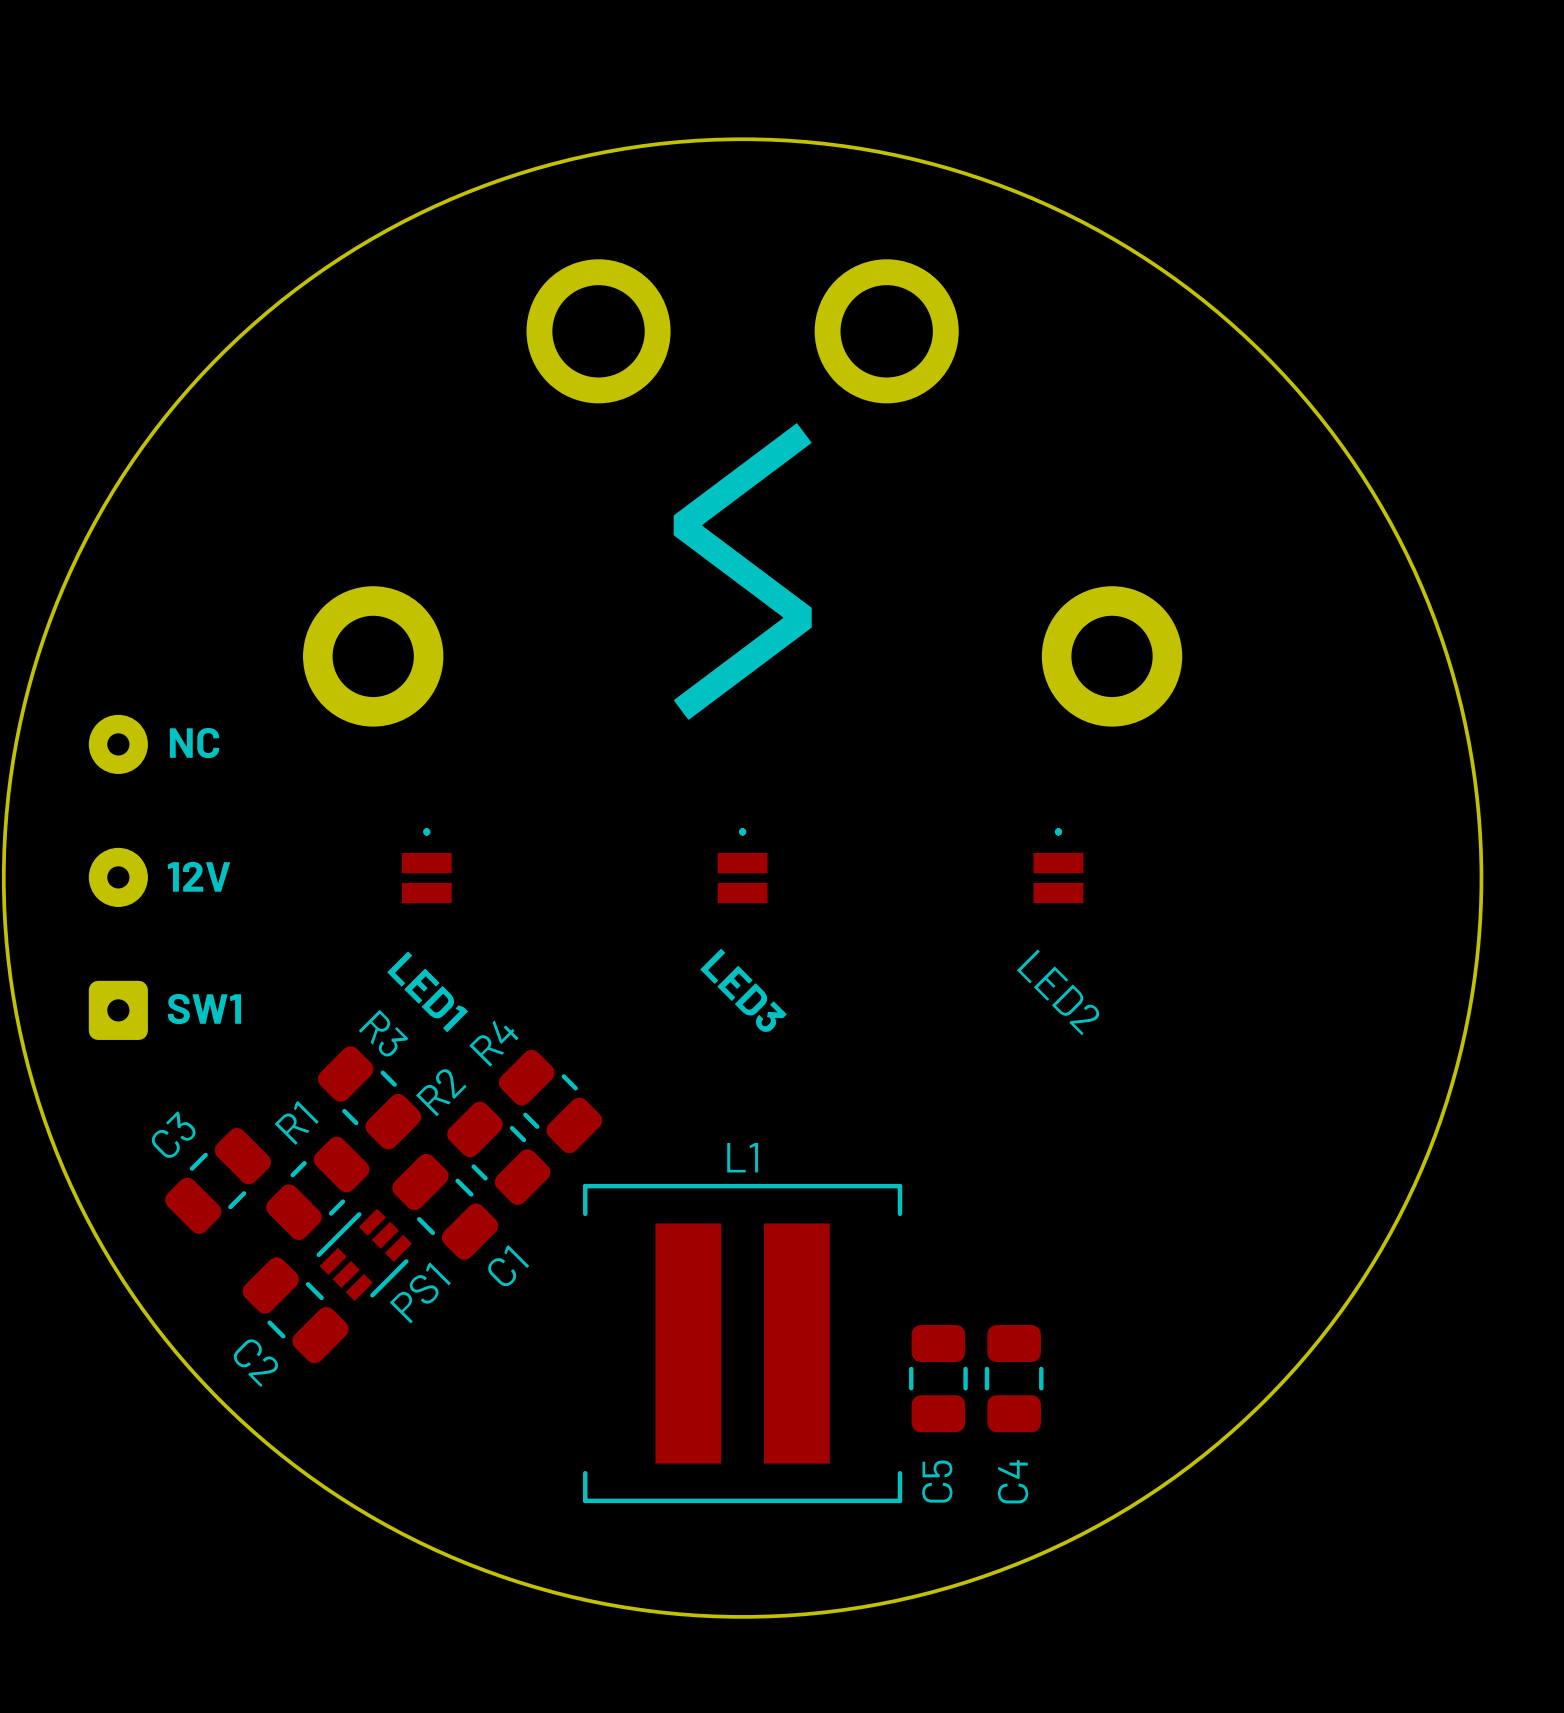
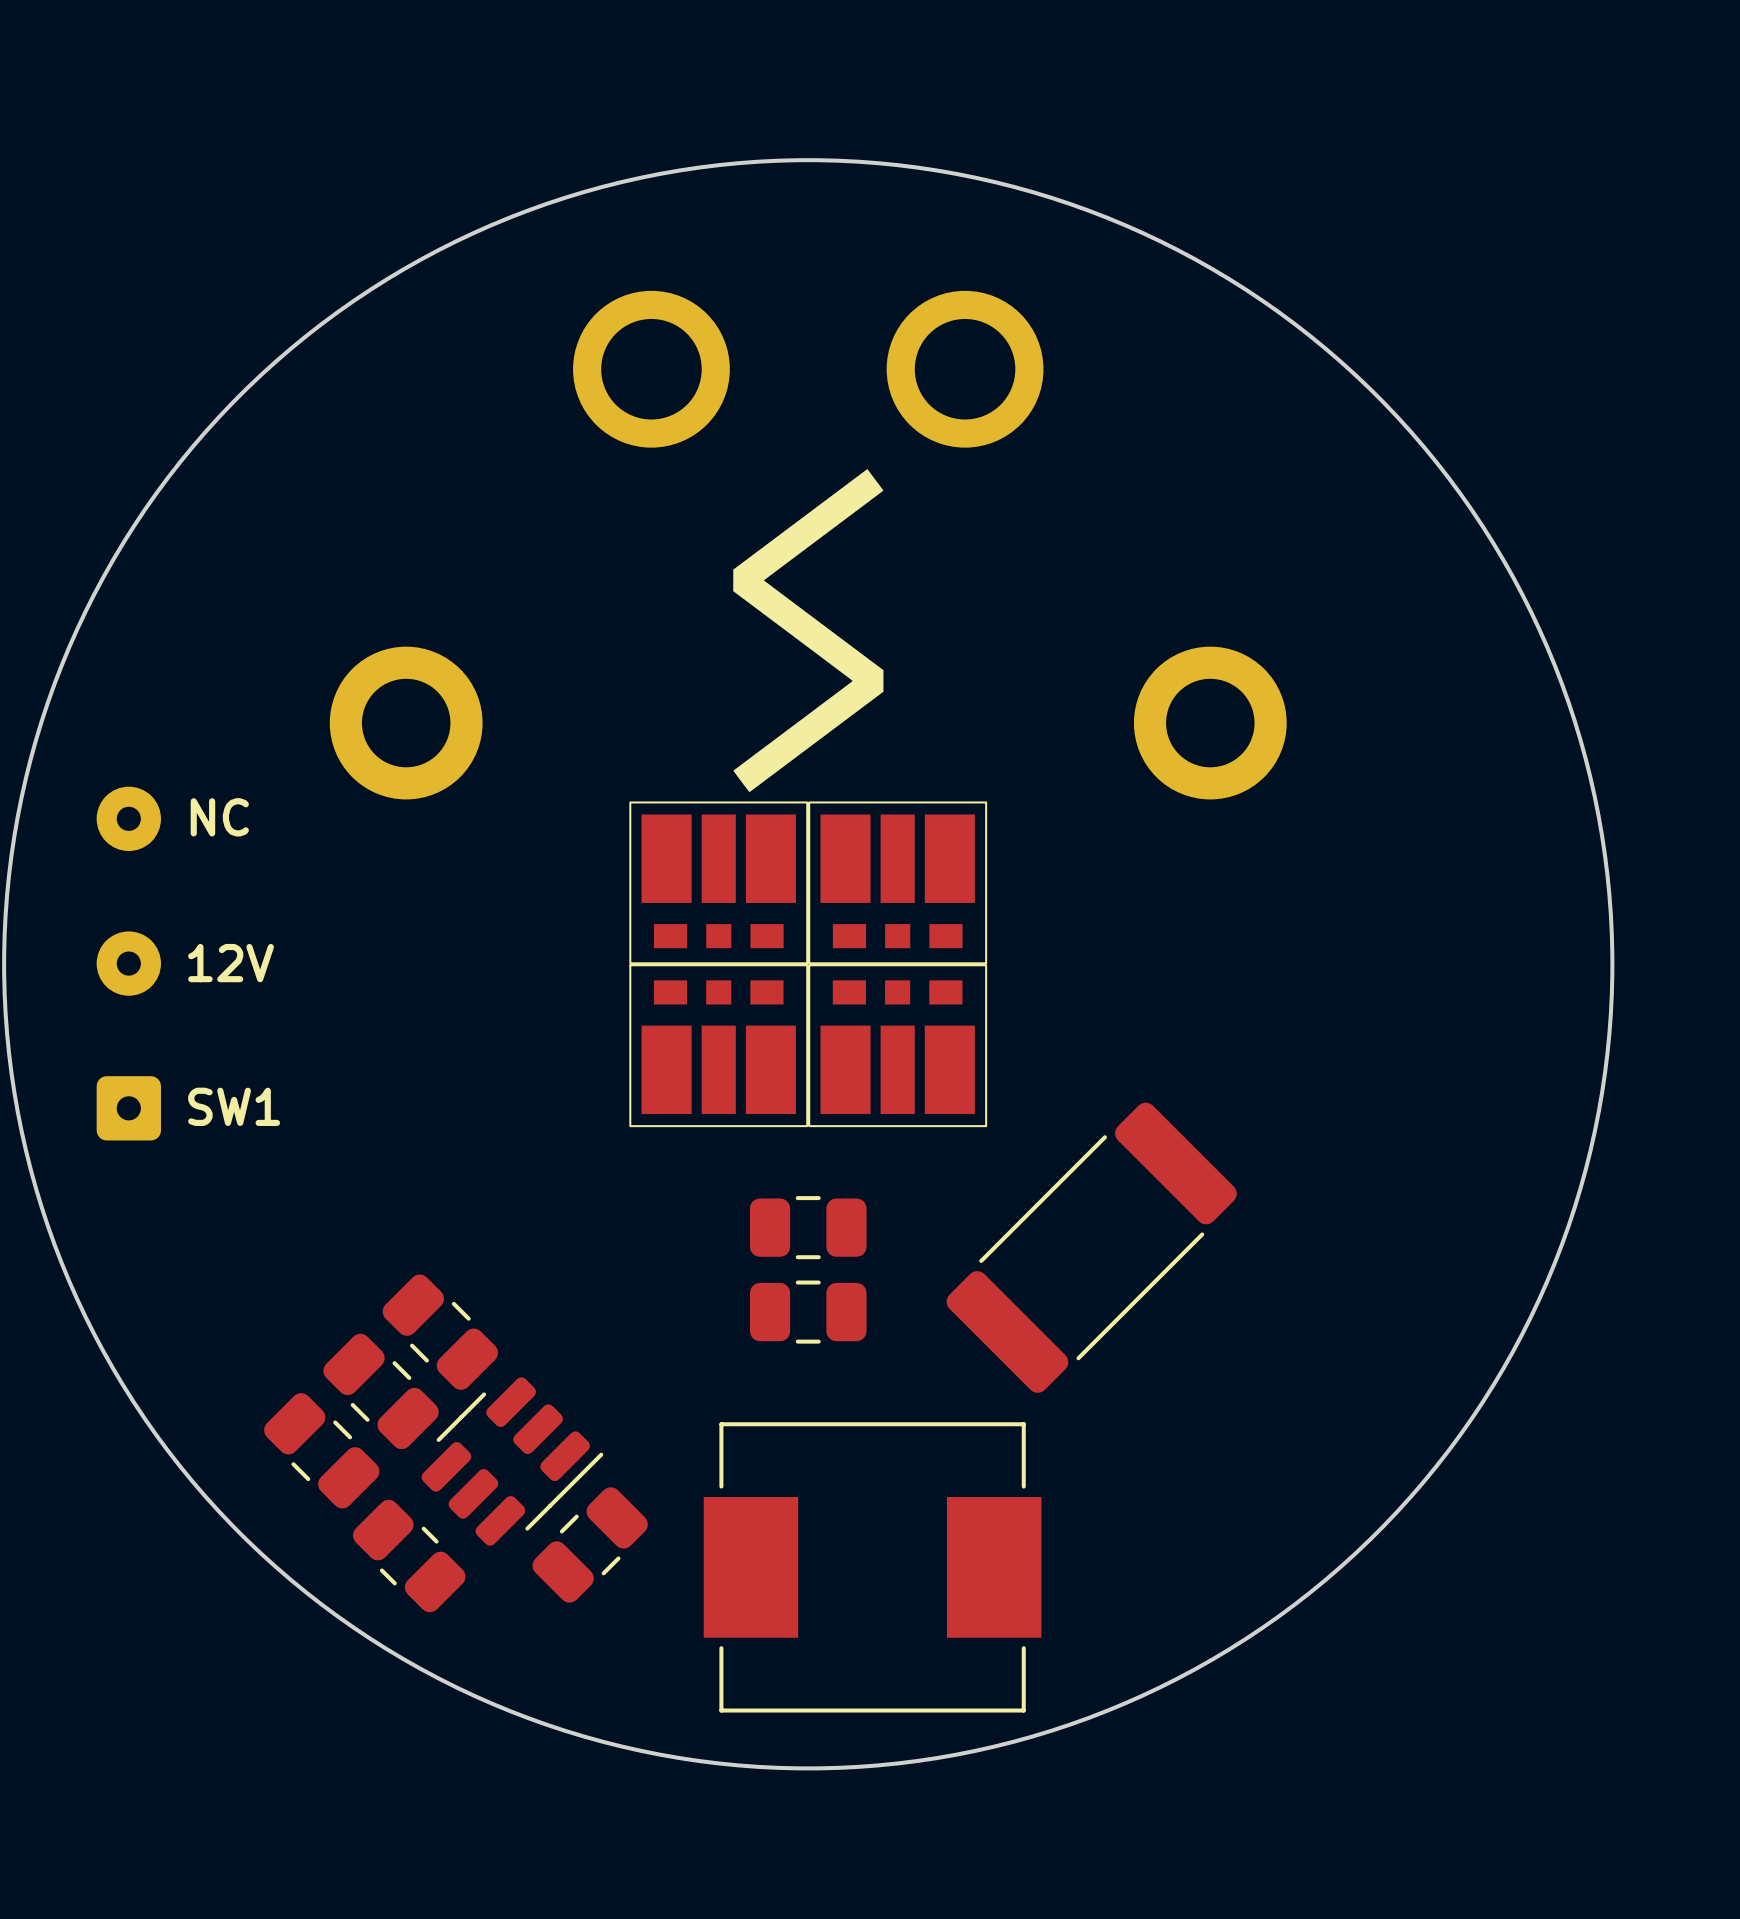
part: none -> (718, 882)
part: none -> (897, 882)
LED1: (426, 865) -> none
LED3: (742, 865) -> none
LED2: (1058, 865) -> none
part: none -> (718, 1045)
part: none -> (897, 1045)
R3: (369, 1097) -> none
R4: (550, 1101) -> none
part: none -> (808, 1227)
part: none -> (1091, 1247)
R2: (498, 1153) -> none
C3: (218, 1180) -> none
R1: (317, 1188) -> none
part: none -> (808, 1312)
C1: (445, 1206) -> none
part: none -> (440, 1332)
PS1: (364, 1254) -> none
part: none -> (381, 1391)
C2: (295, 1310) -> none
part: none -> (321, 1450)
part: none -> (512, 1461)
L1: (742, 1343) -> none
C5: (938, 1378) -> none
C4: (1014, 1378) -> none
part: none -> (590, 1544)
part: none -> (409, 1556)
part: none -> (872, 1567)

